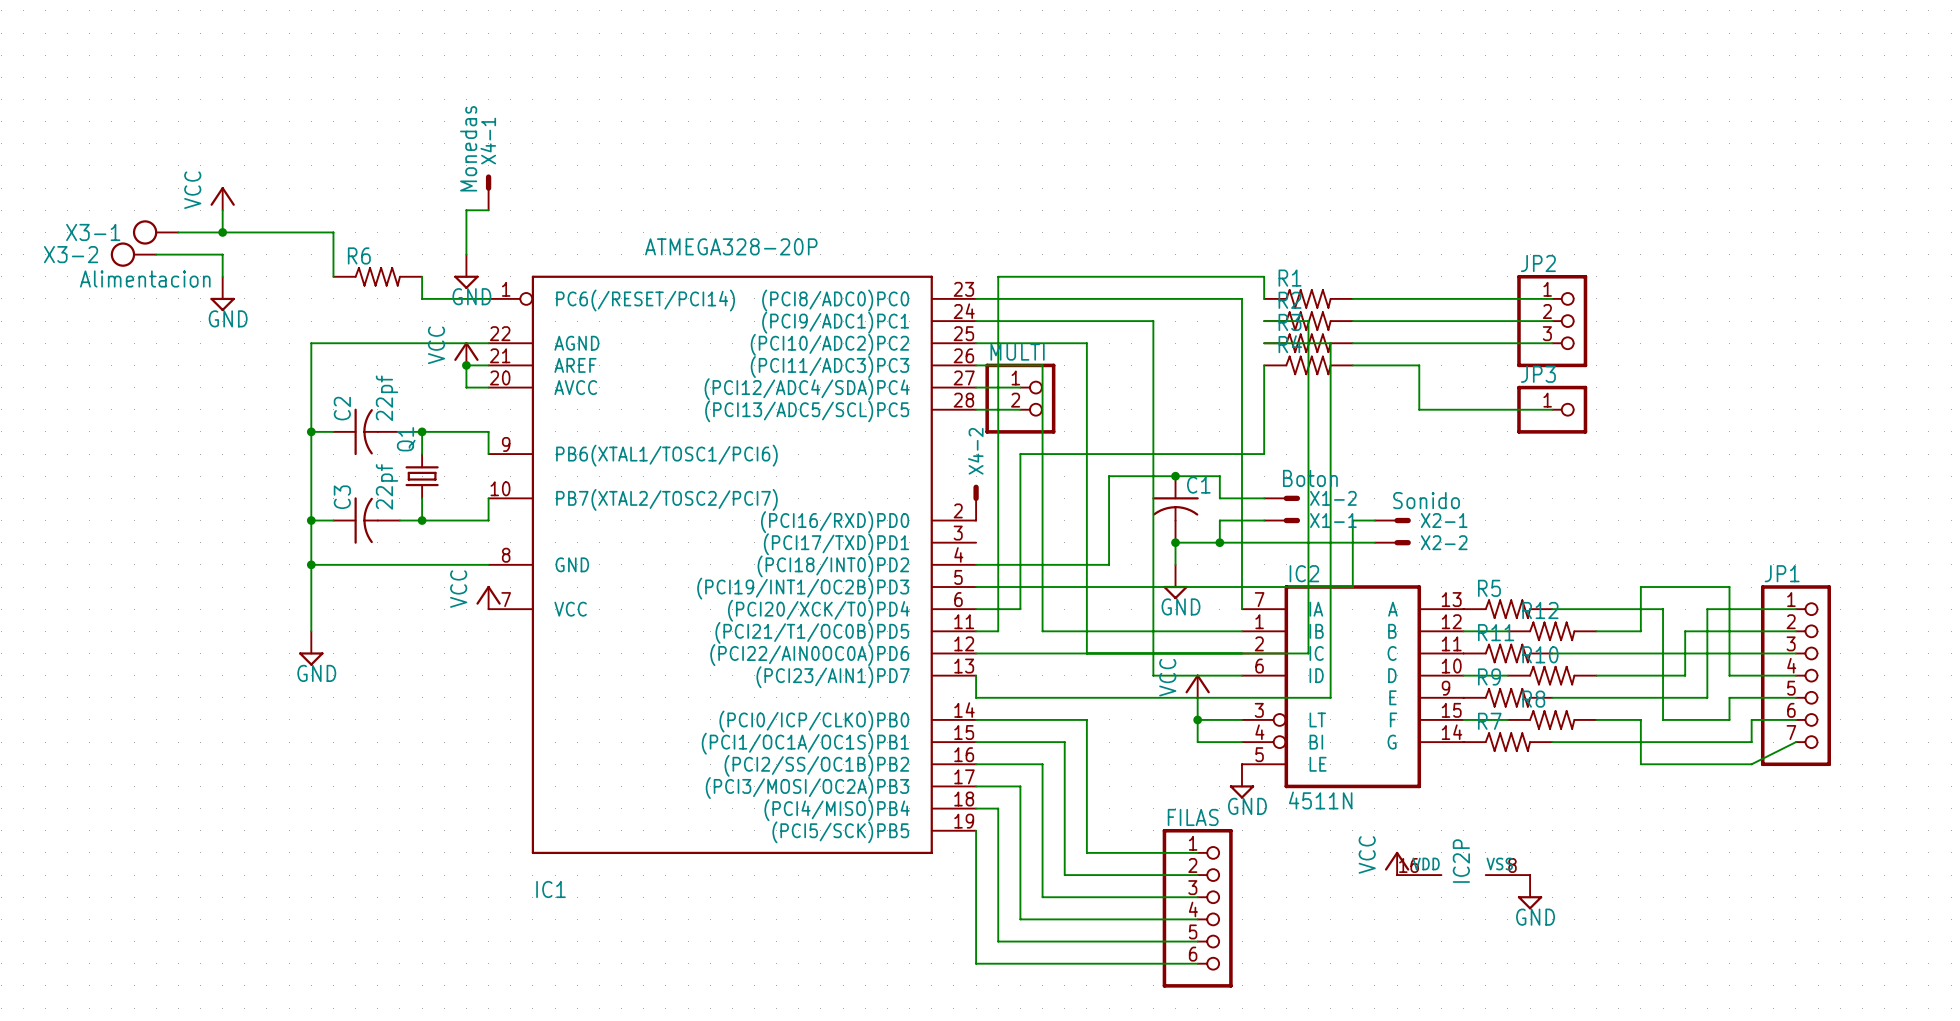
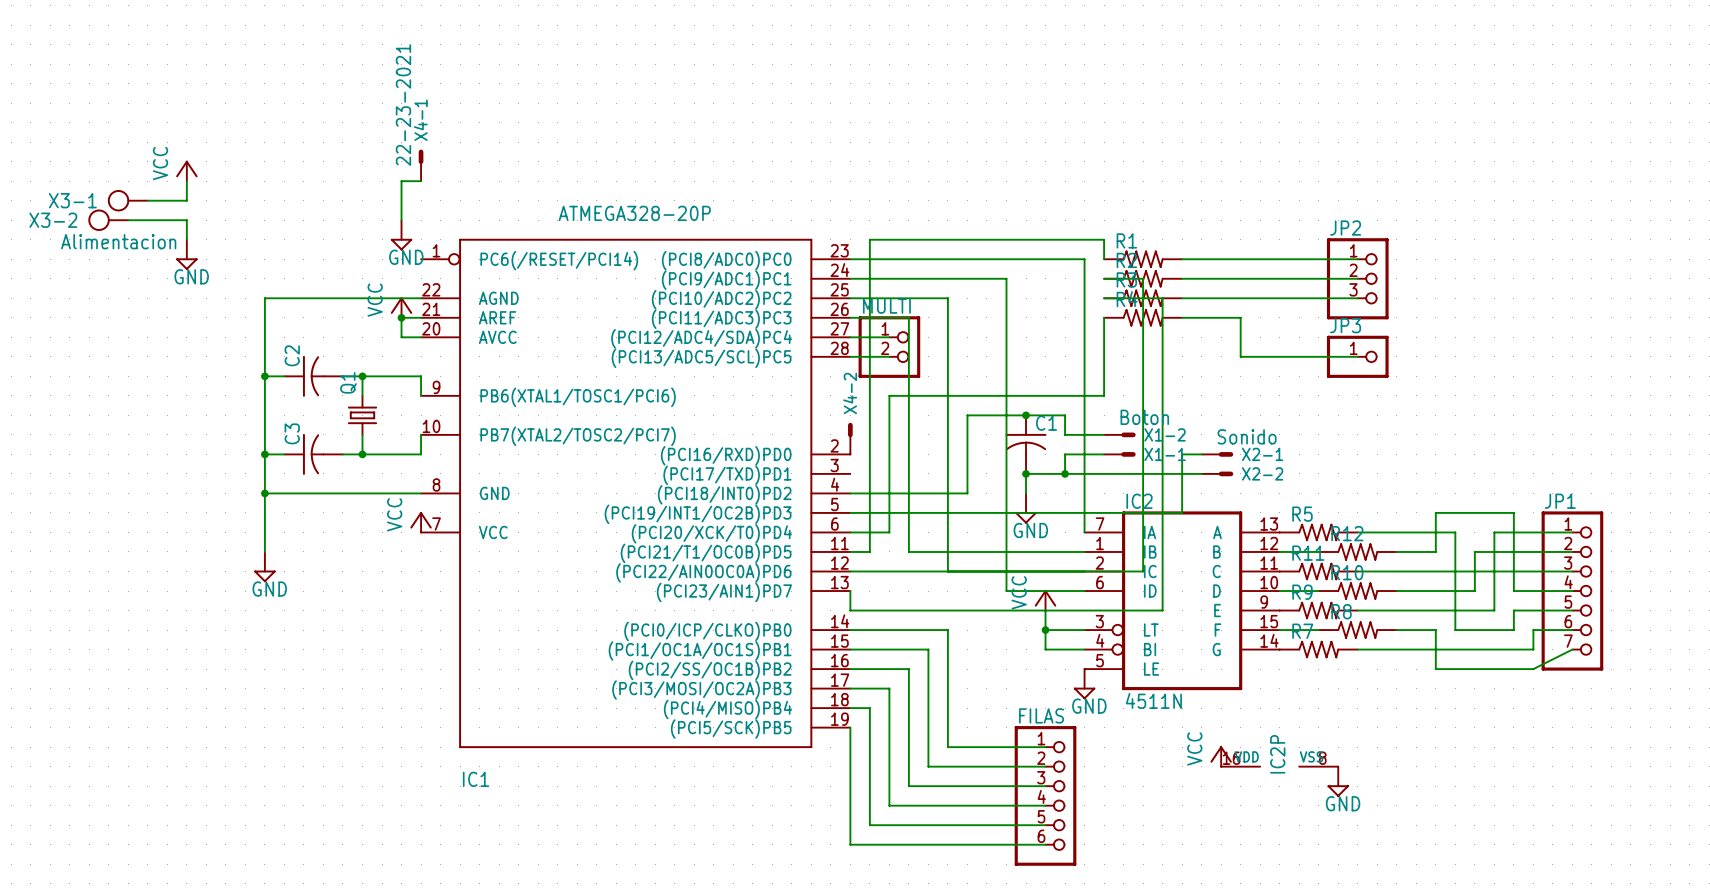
X4-1 value: Monedas (468, 148) -> 22-23-2021 (403, 105)
wire: (222, 232) (333, 232) (333, 276) -> none
junction: (222, 232) -> none
R6: (377, 276) -> none
wire: (422, 276) (422, 298) (488, 298) -> none
C2 value: 22pf (387, 398) -> none
C3 value: 22pf (387, 486) -> none

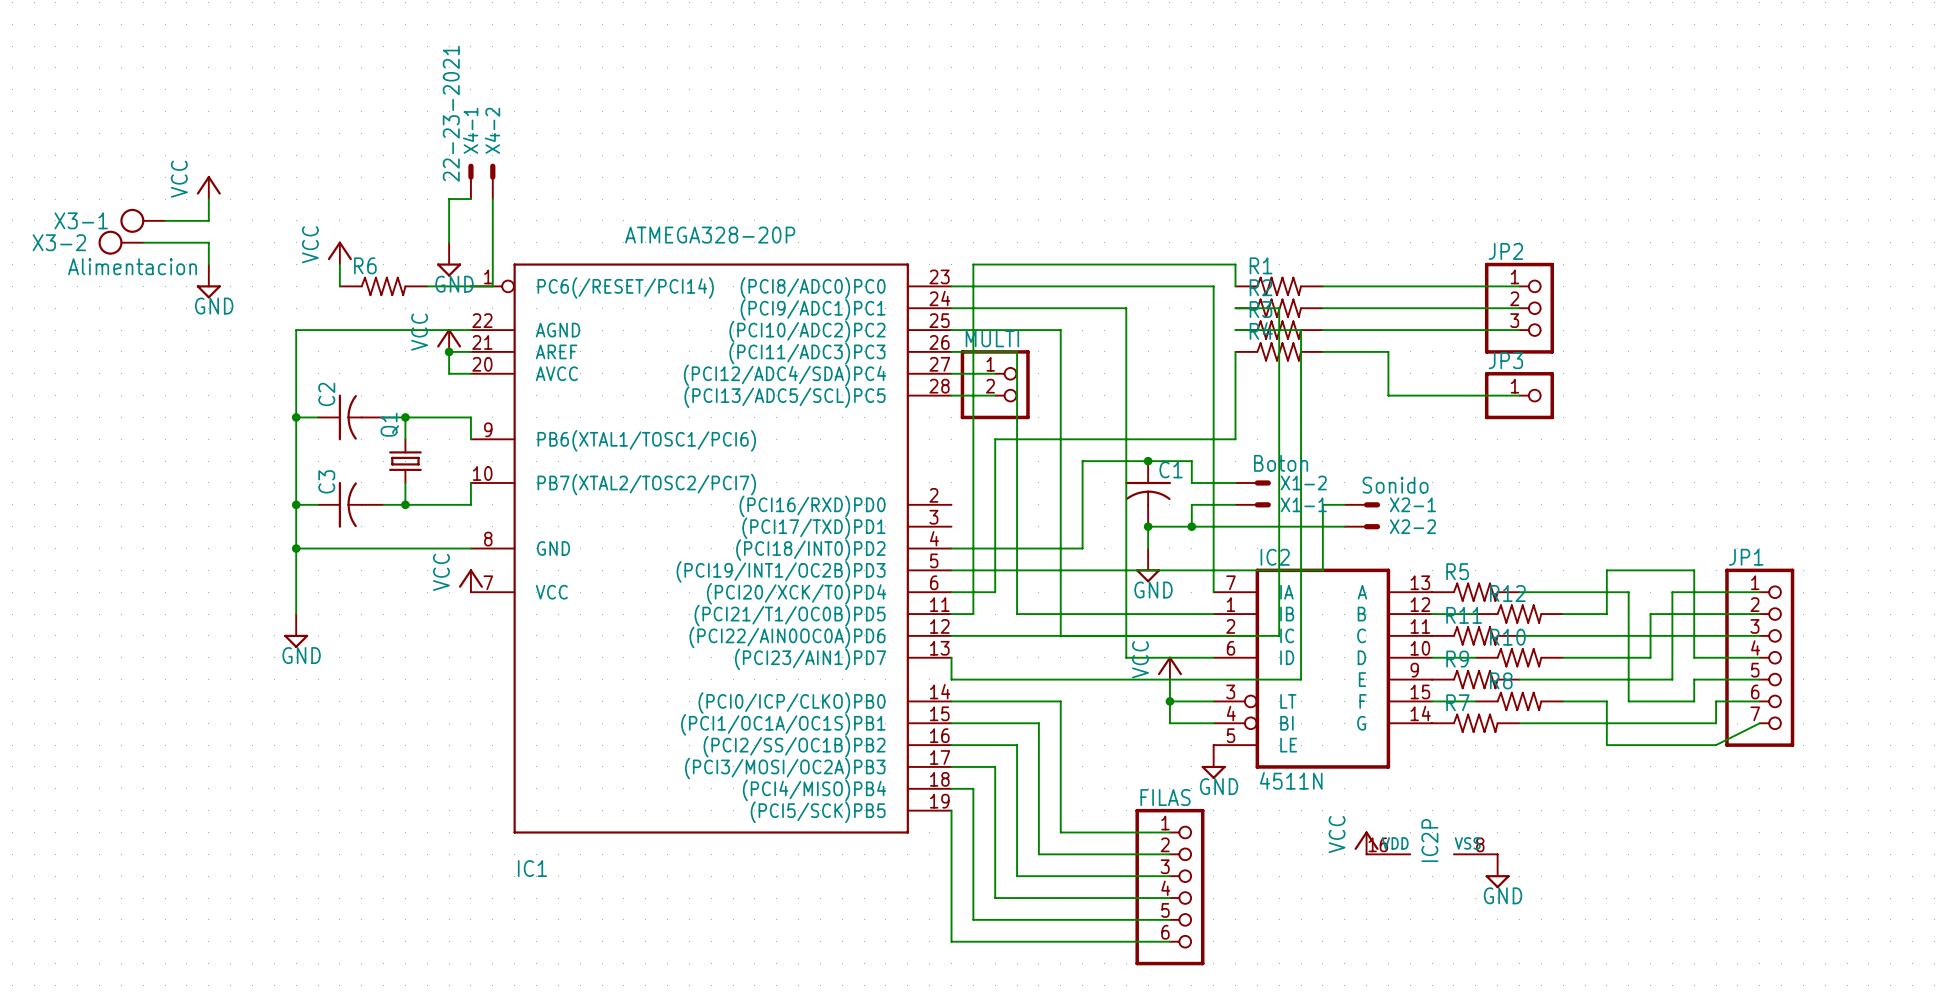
wire: none -> (492, 199) (492, 286) (427, 286)
power symbol: none -> VCC (339, 253)
wire: none -> (339, 264) (339, 286)
R6: none -> (383, 286)
X4-2 position: (850, 438) -> (492, 181)

